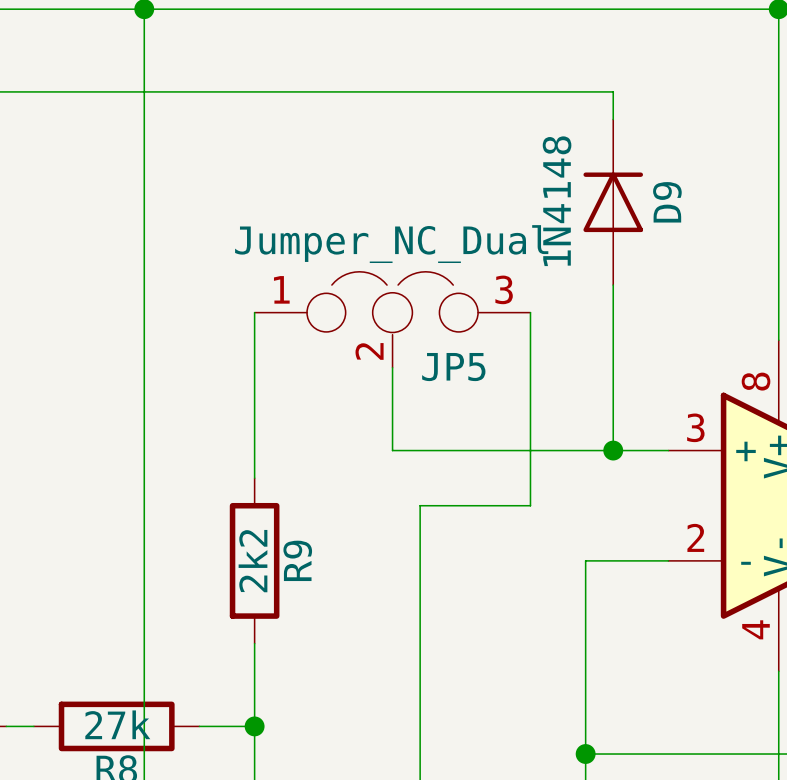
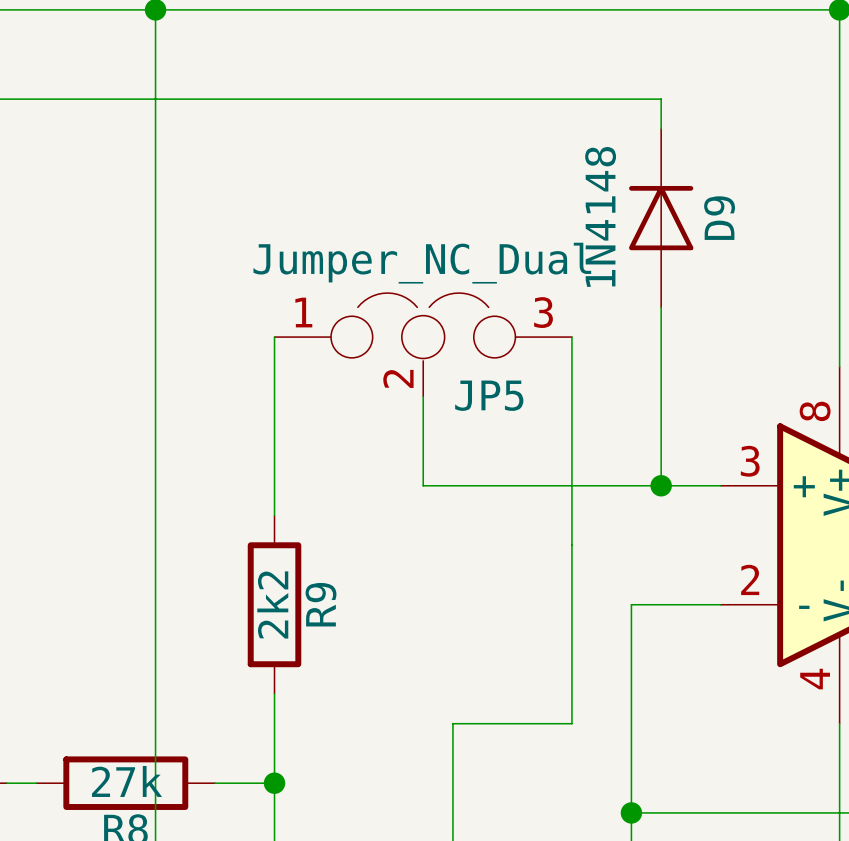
wire: (530, 505) (420, 505) (420, 671) -> (571, 545) (571, 723) (452, 723)

